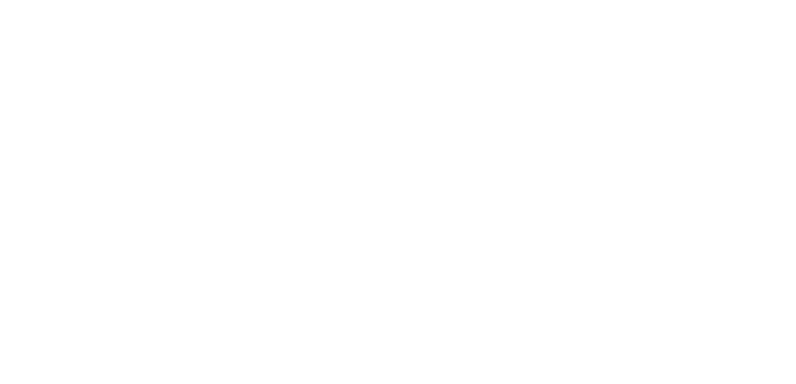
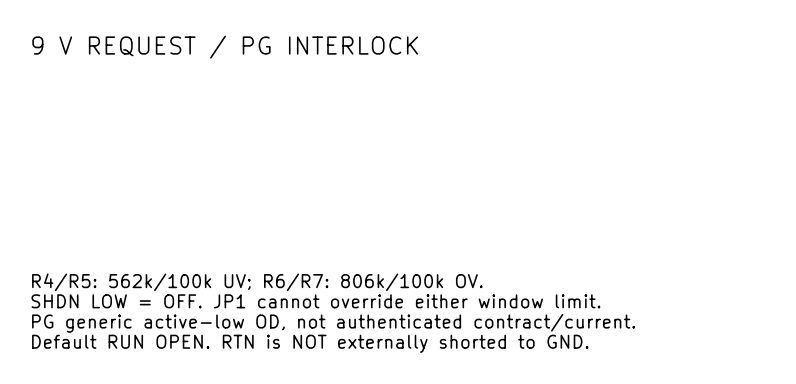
text: none -> 9 V REQUEST / PG INTERLOCK (225, 47)
text: none -> R4/R5: 562k/100k UV; R6/R7: 806k/100k OV. (257, 282)
text: none -> SHDN LOW = OFF. JP1 cannot override either window limit. (315, 301)
text: none -> PG generic active-low OD, not authenticated contract/current. (333, 323)
text: none -> Default RUN OPEN. RTN is NOT externally shorted to GND. (310, 343)

